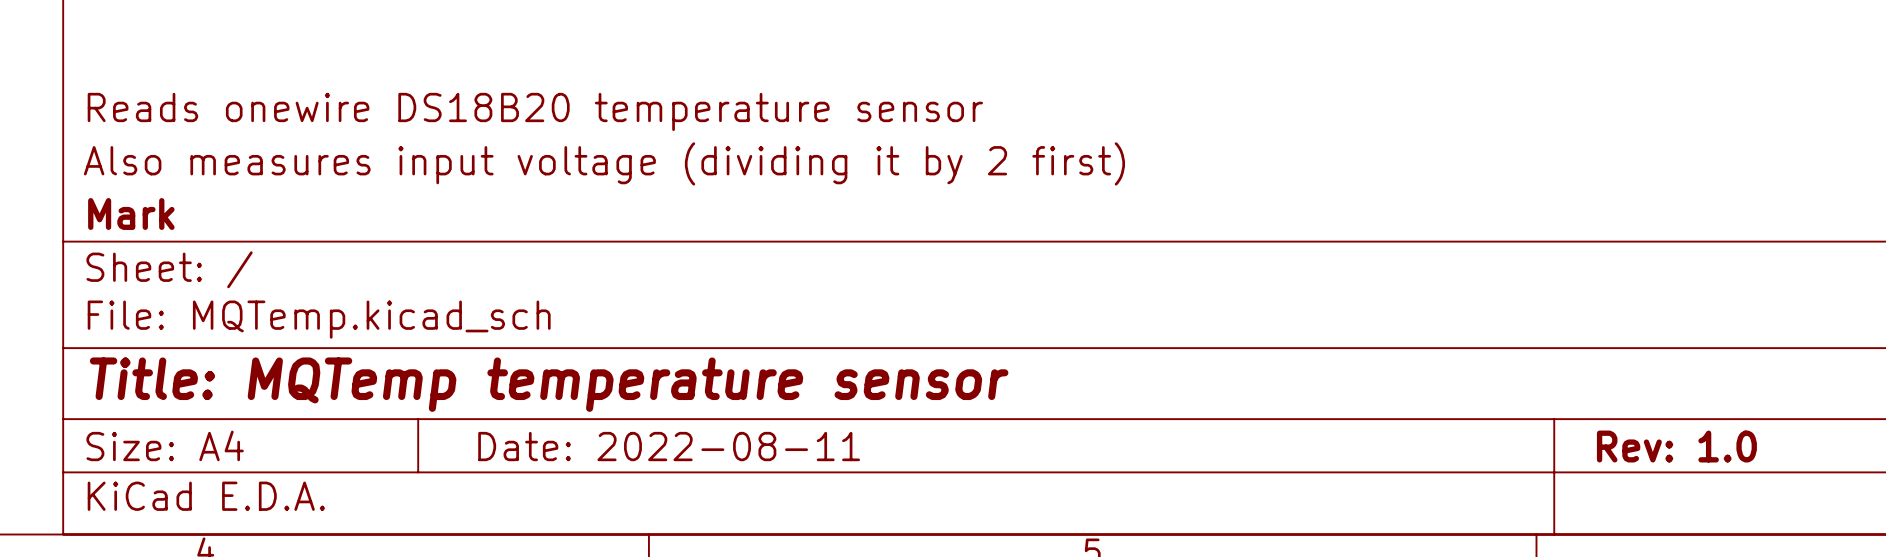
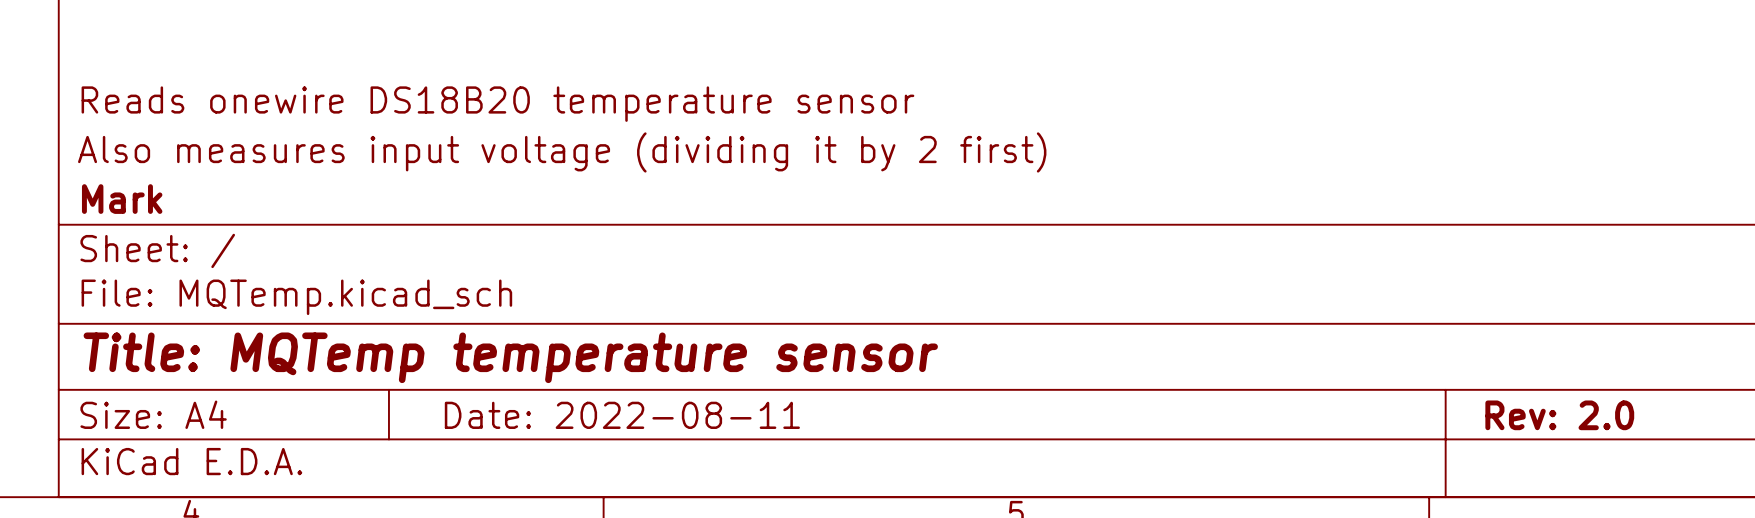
title block: Rev: 1.0 (1676, 446) -> Rev: 2.0 (1559, 415)

